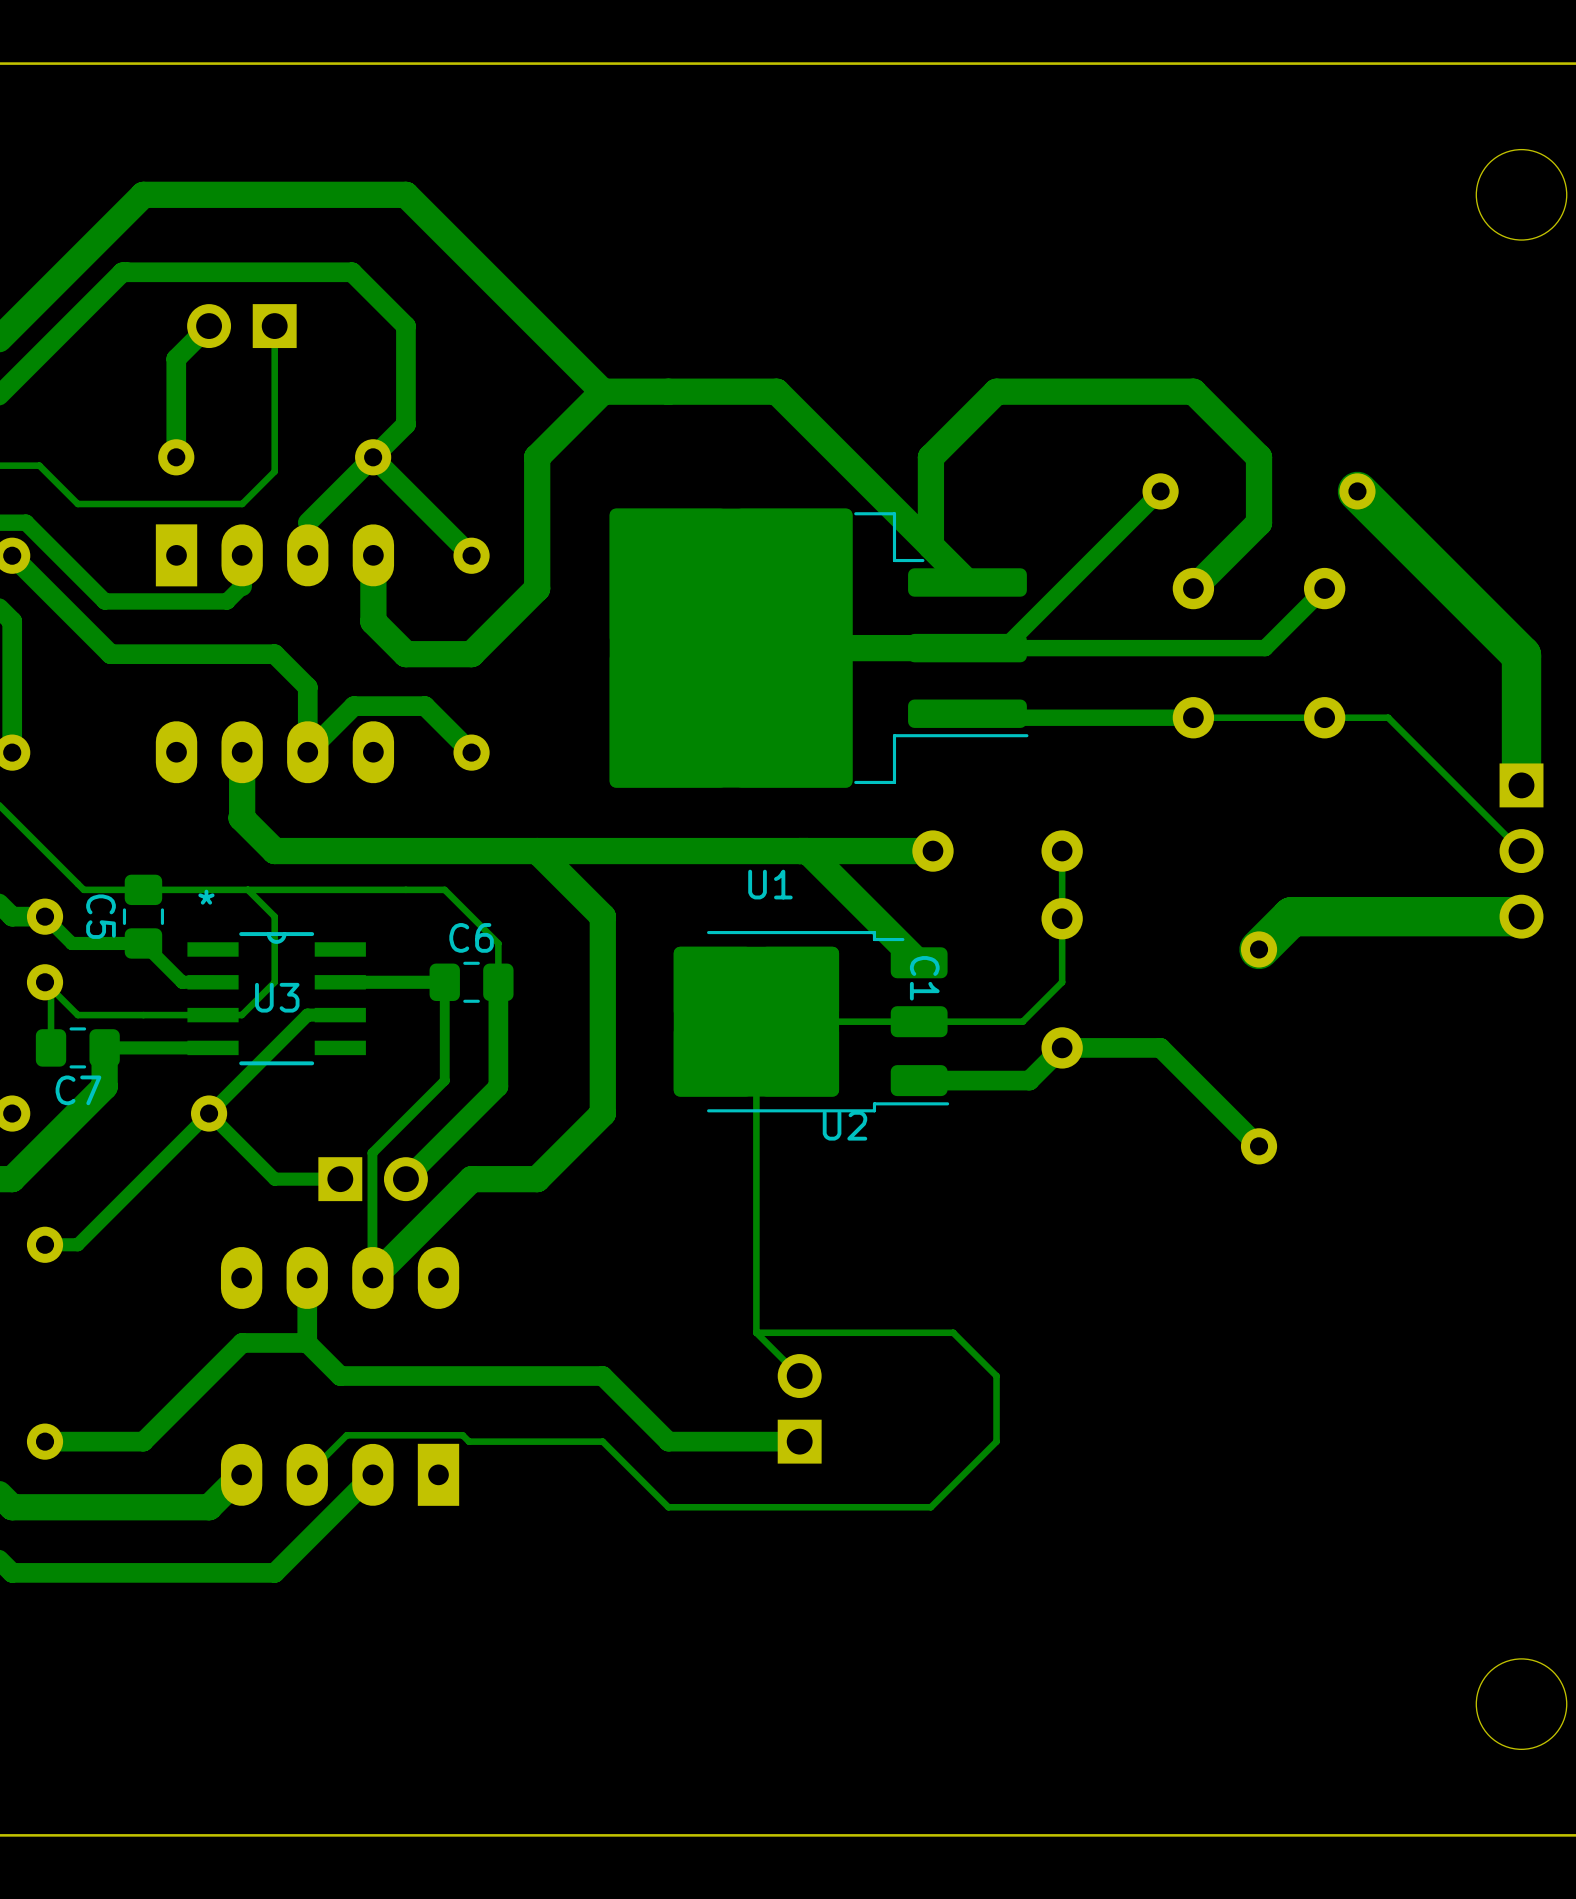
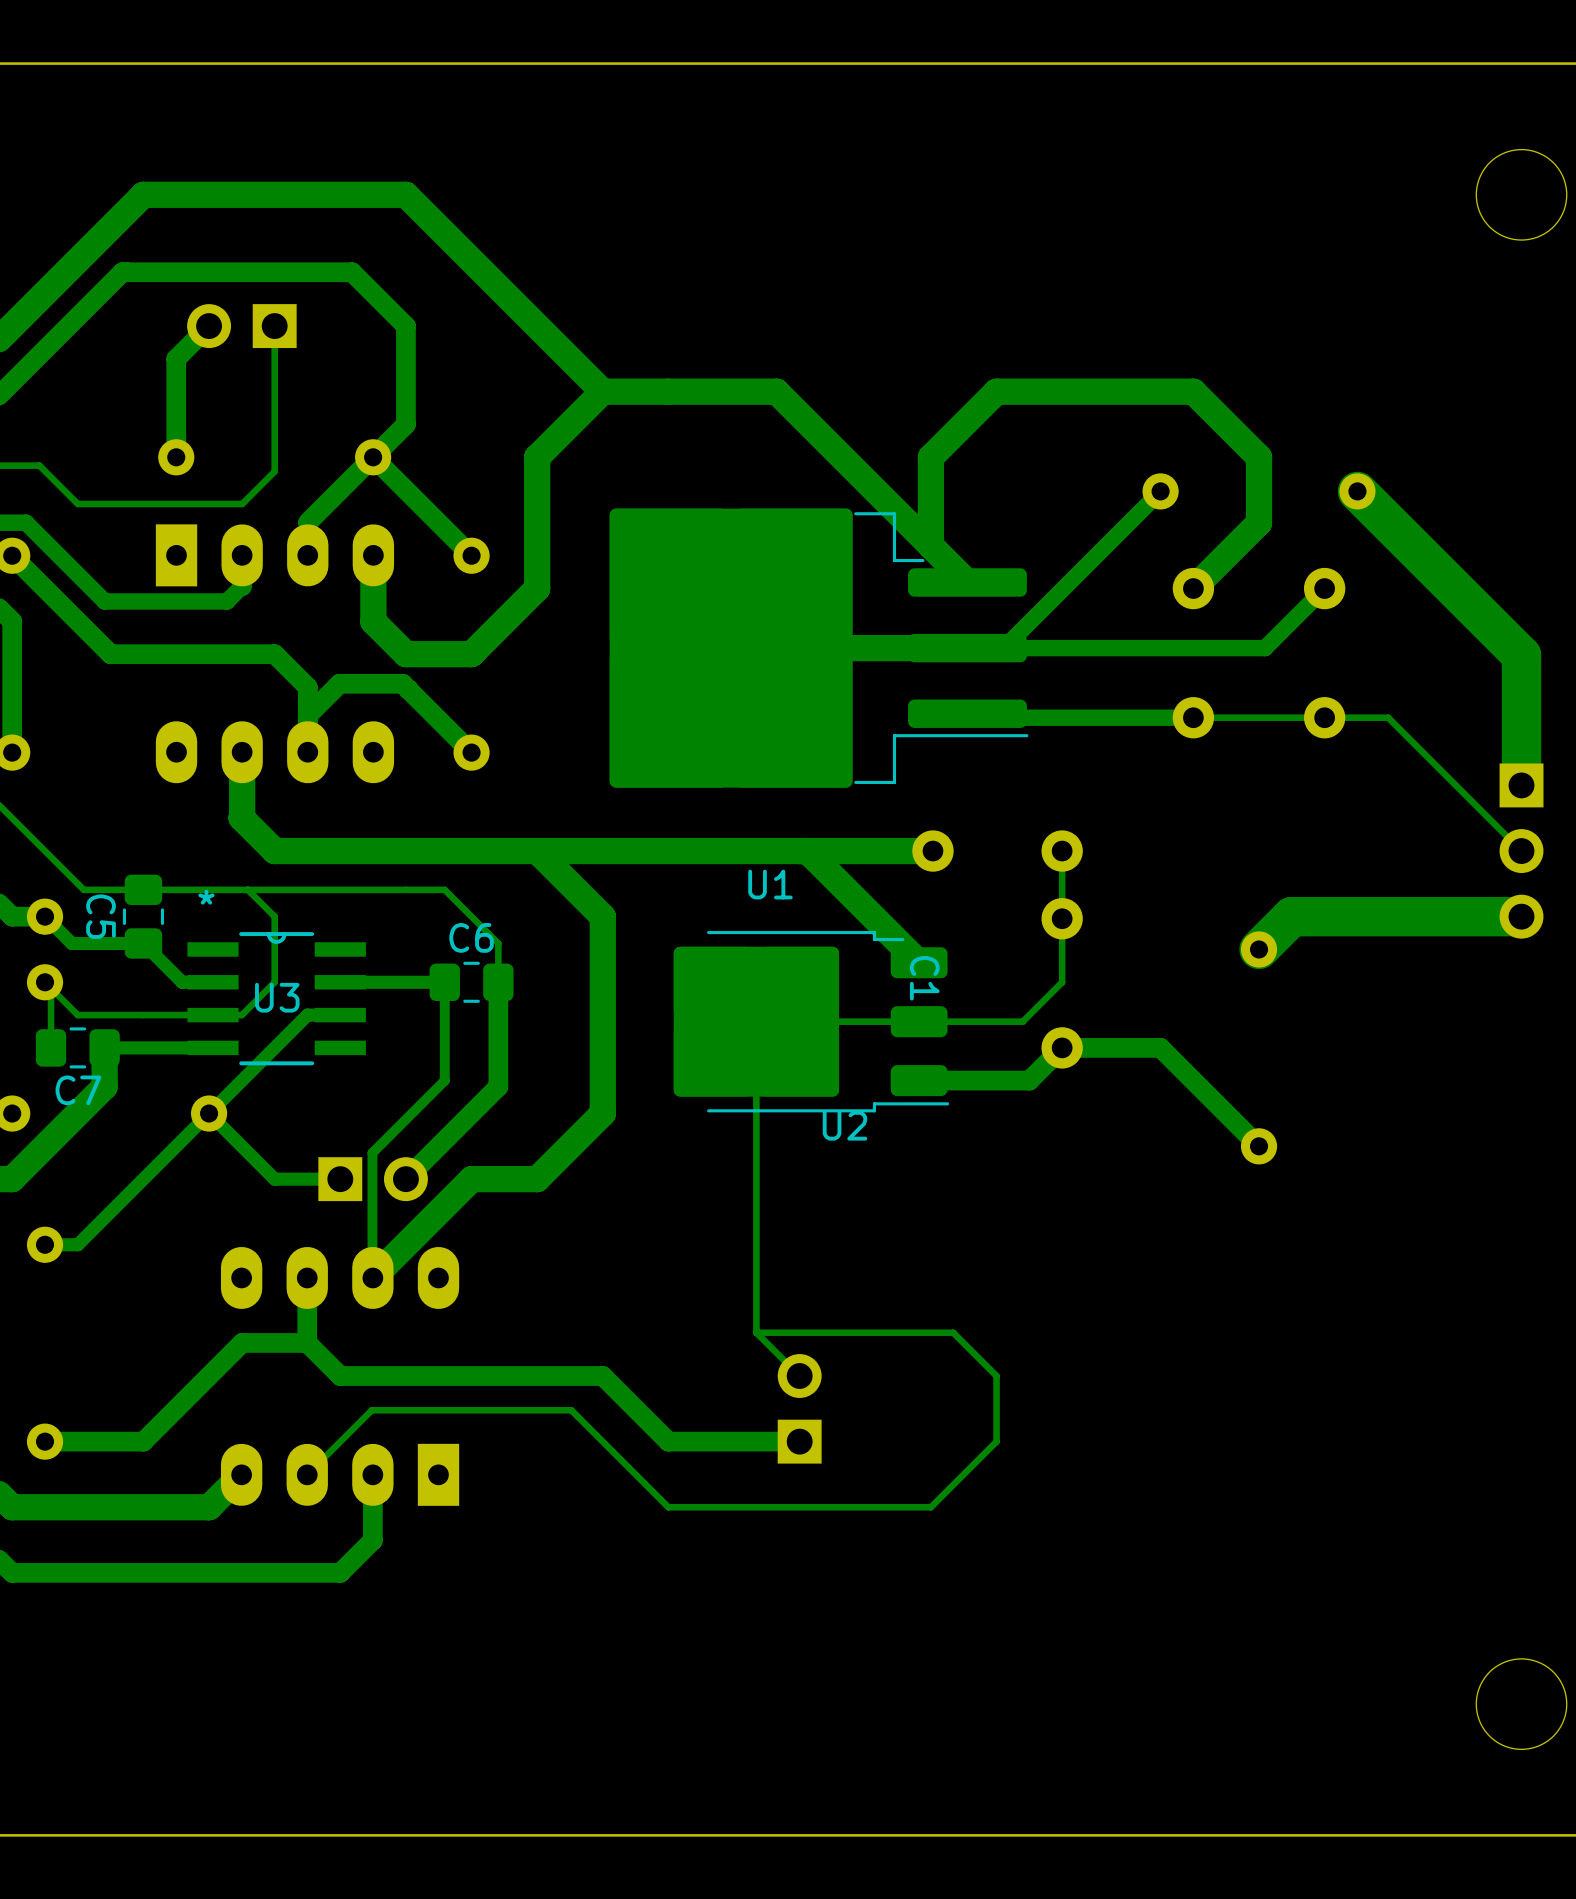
track: (425, 706) (353, 706) (307, 752) -> (425, 706) (402, 683) (339, 683) (307, 715)
track: (346, 1435) (462, 1435) (469, 1441) (602, 1441) -> (346, 1435) (371, 1410) (571, 1410) (602, 1441)
track: (372, 1474) (274, 1572) -> (372, 1474) (372, 1540) (340, 1572) (274, 1572)

